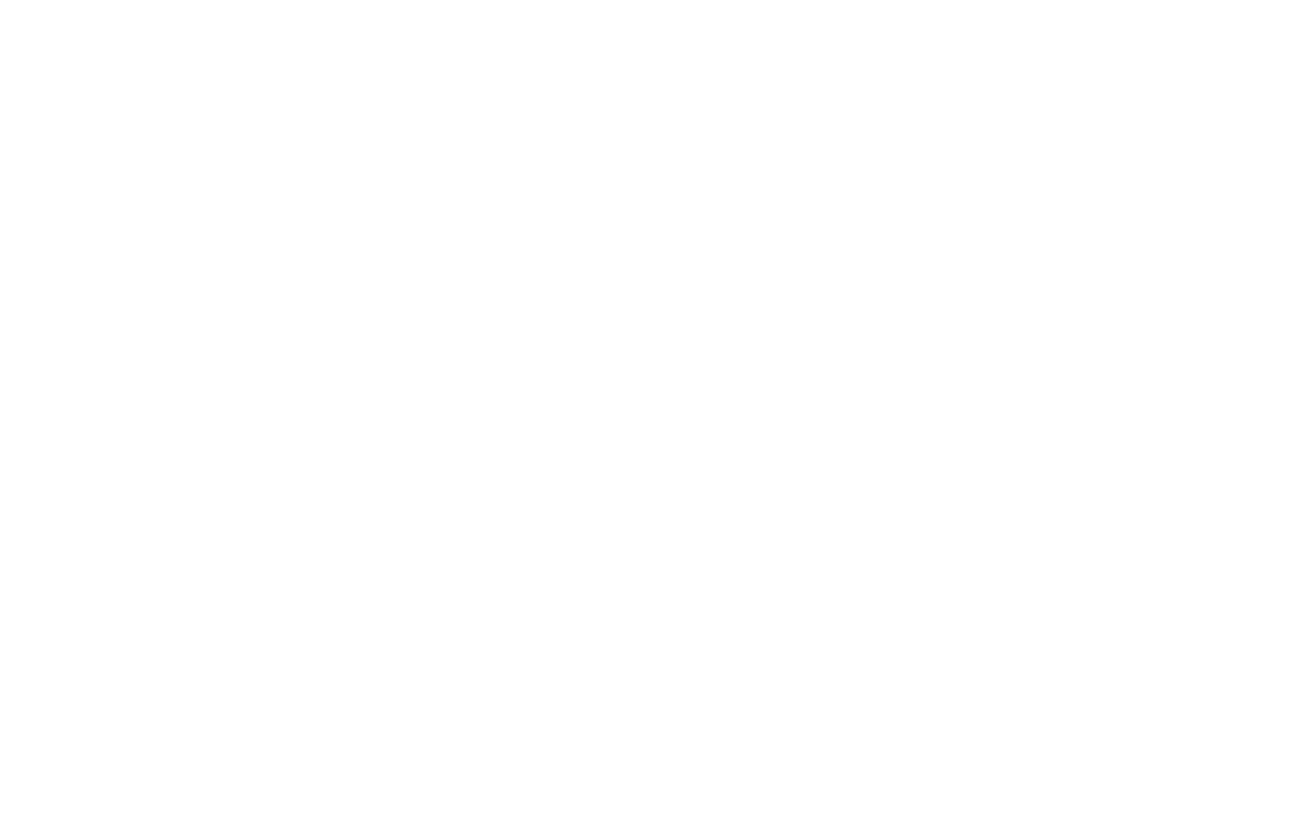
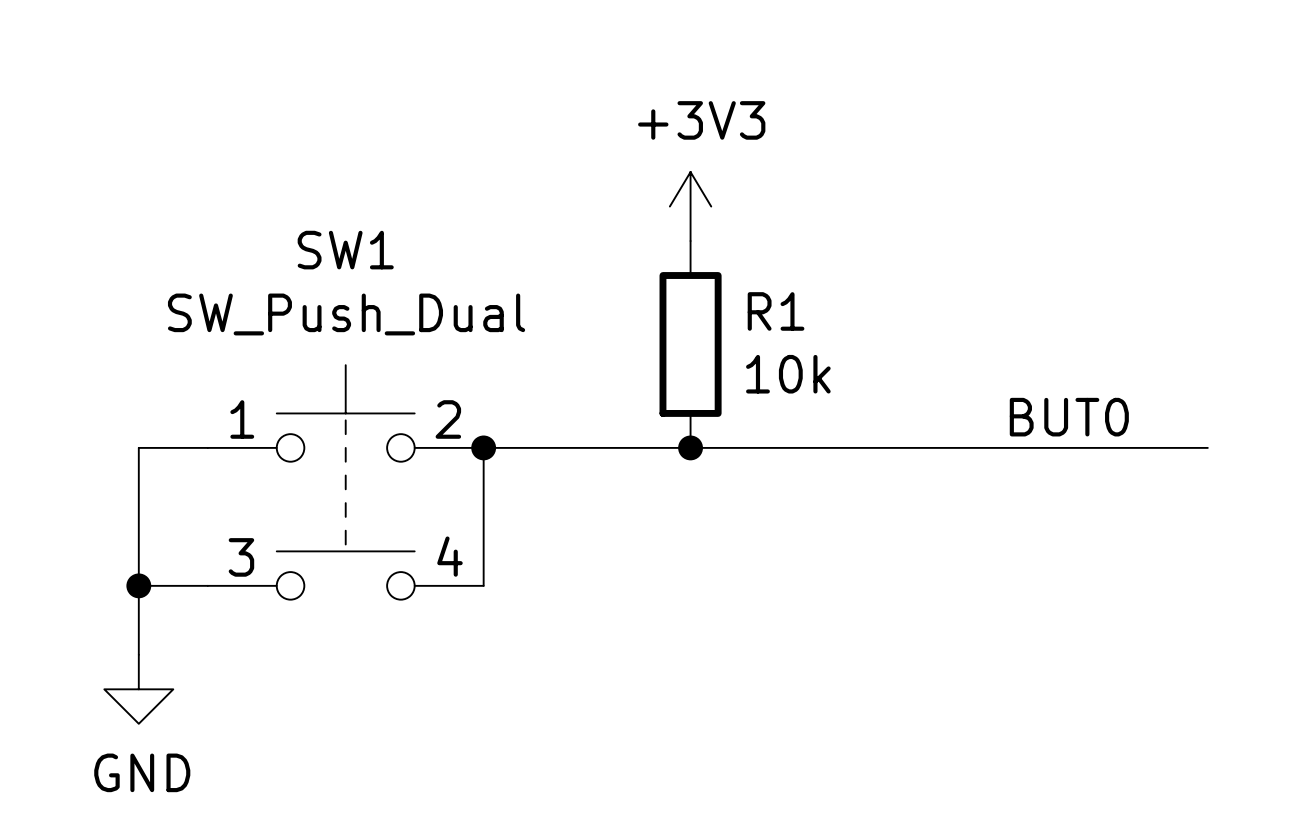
power symbol: none -> +3V3 (690, 206)
R1: none -> 10k (690, 344)
label: none -> BUT0 (1069, 417)
wire: none -> (207, 447) (138, 447) (138, 654)
junction: none -> (483, 447)
junction: none -> (690, 447)
wire: none -> (1207, 447) (483, 447) (483, 585)
SW1: none -> SW_Push_Dual (345, 482)
wire: none -> (138, 585) (207, 585)
junction: none -> (138, 585)
power symbol: none -> GND (138, 689)

